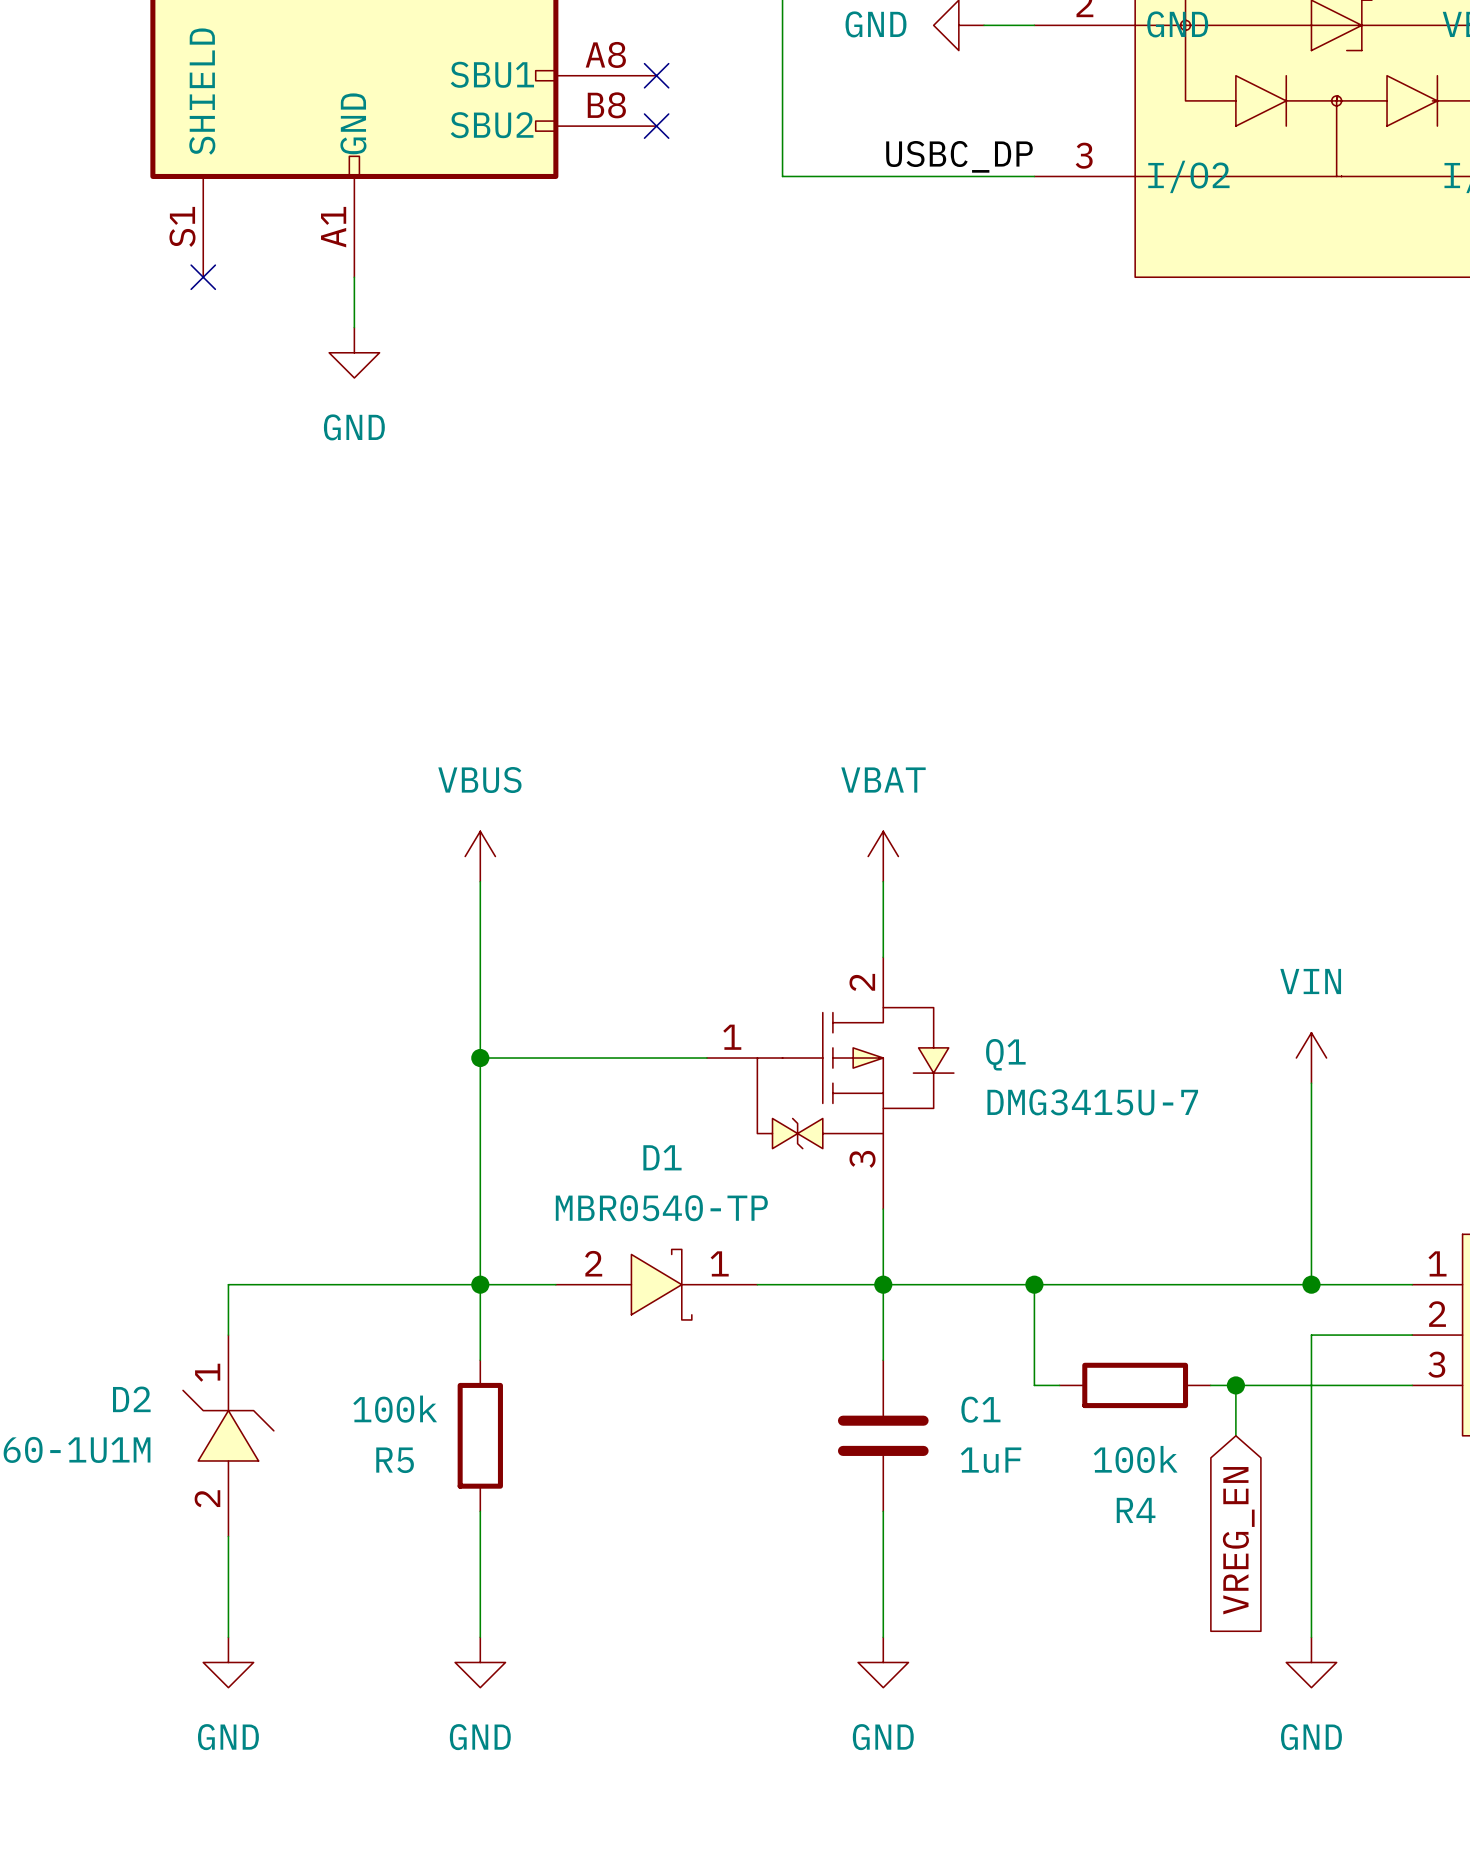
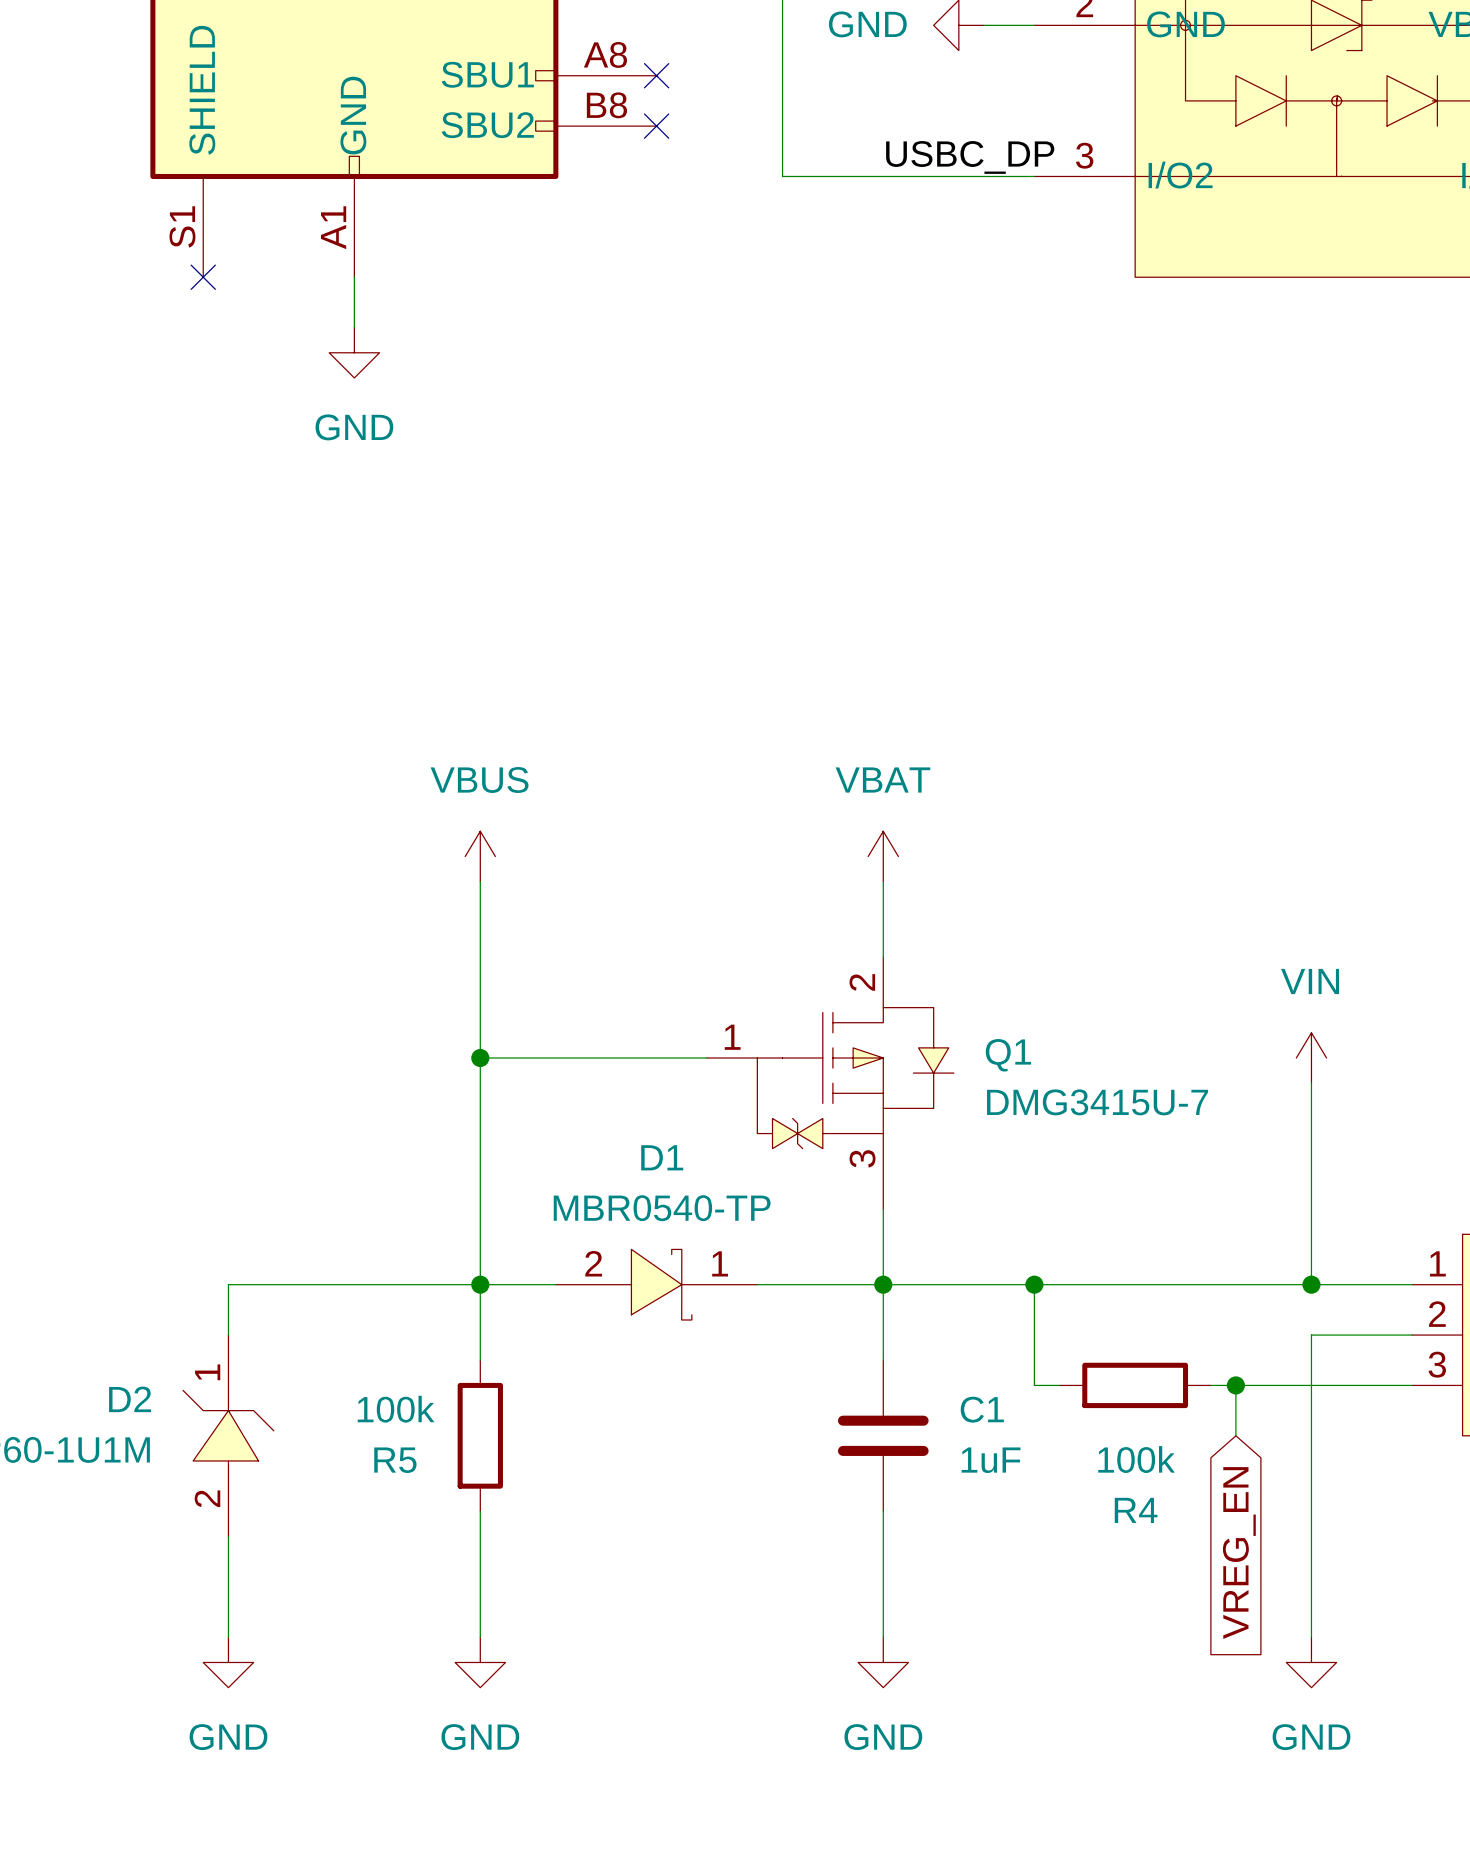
D1 symbol: [555, 1249, 758, 1320] -> [555, 1249, 758, 1320]
D2 symbol: [183, 1335, 274, 1537] -> [183, 1335, 274, 1537]

